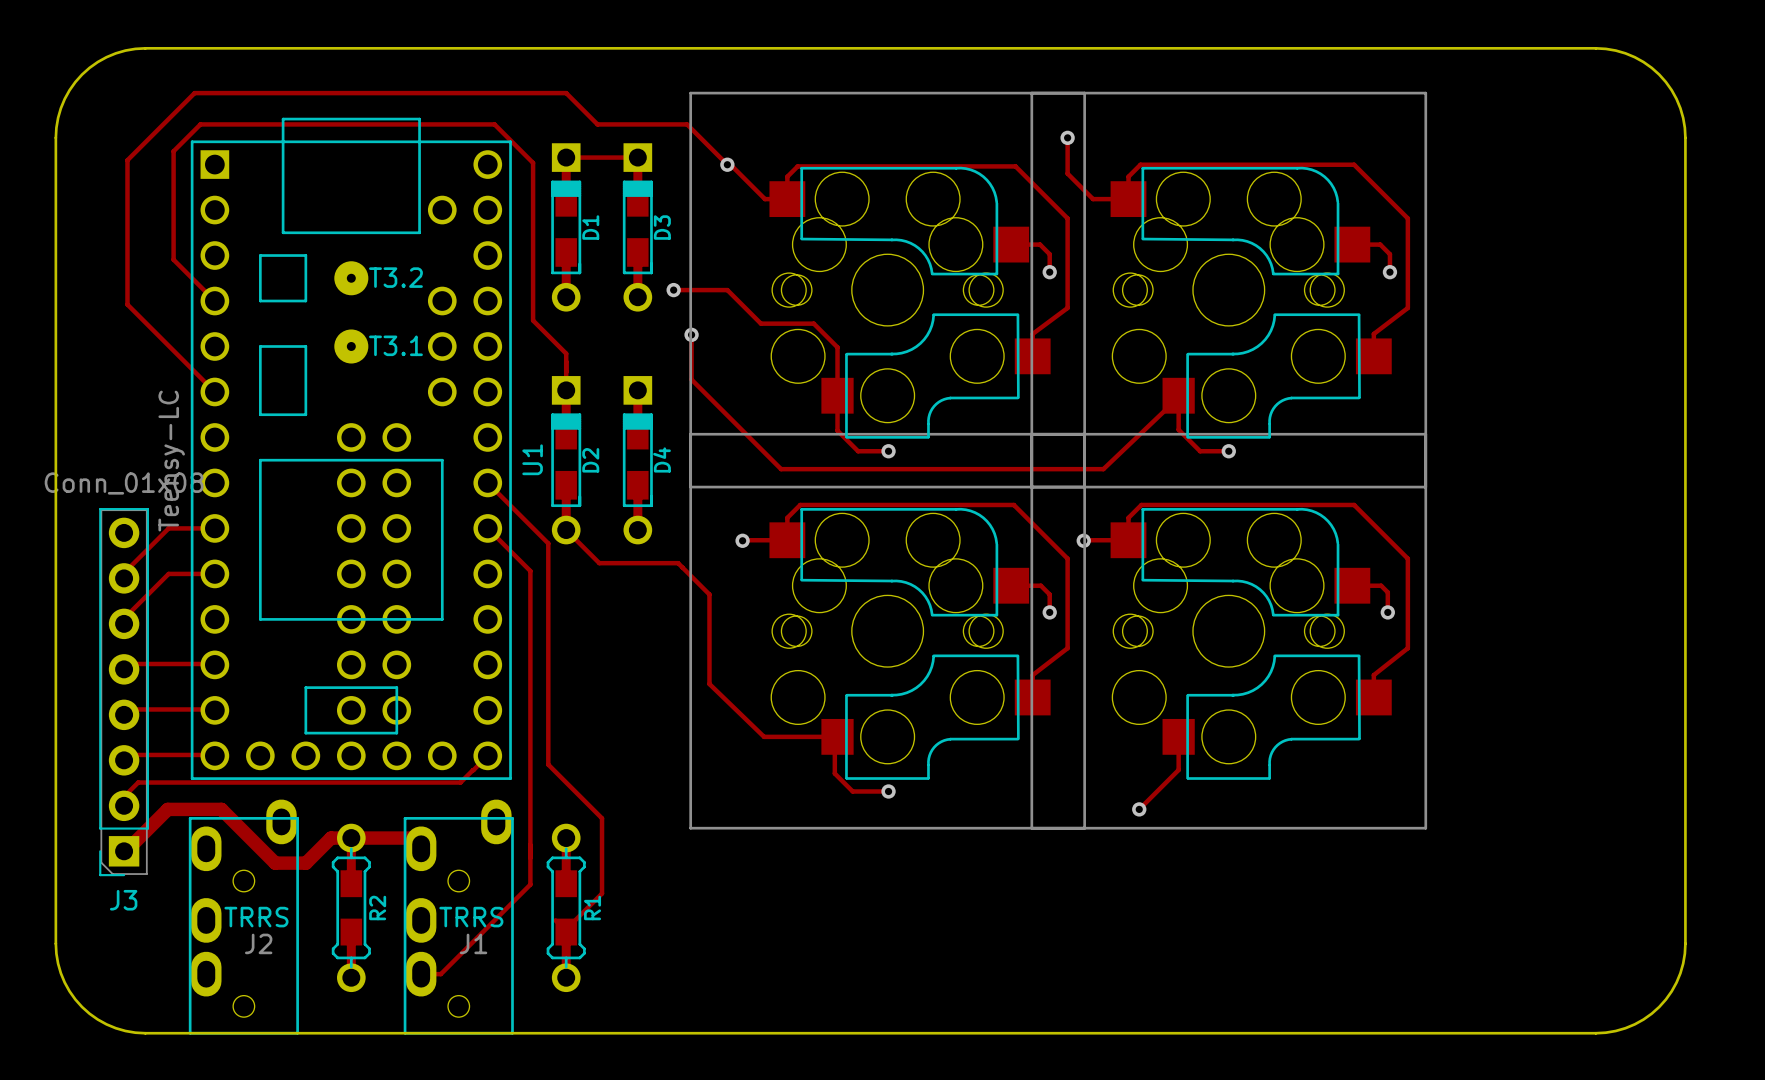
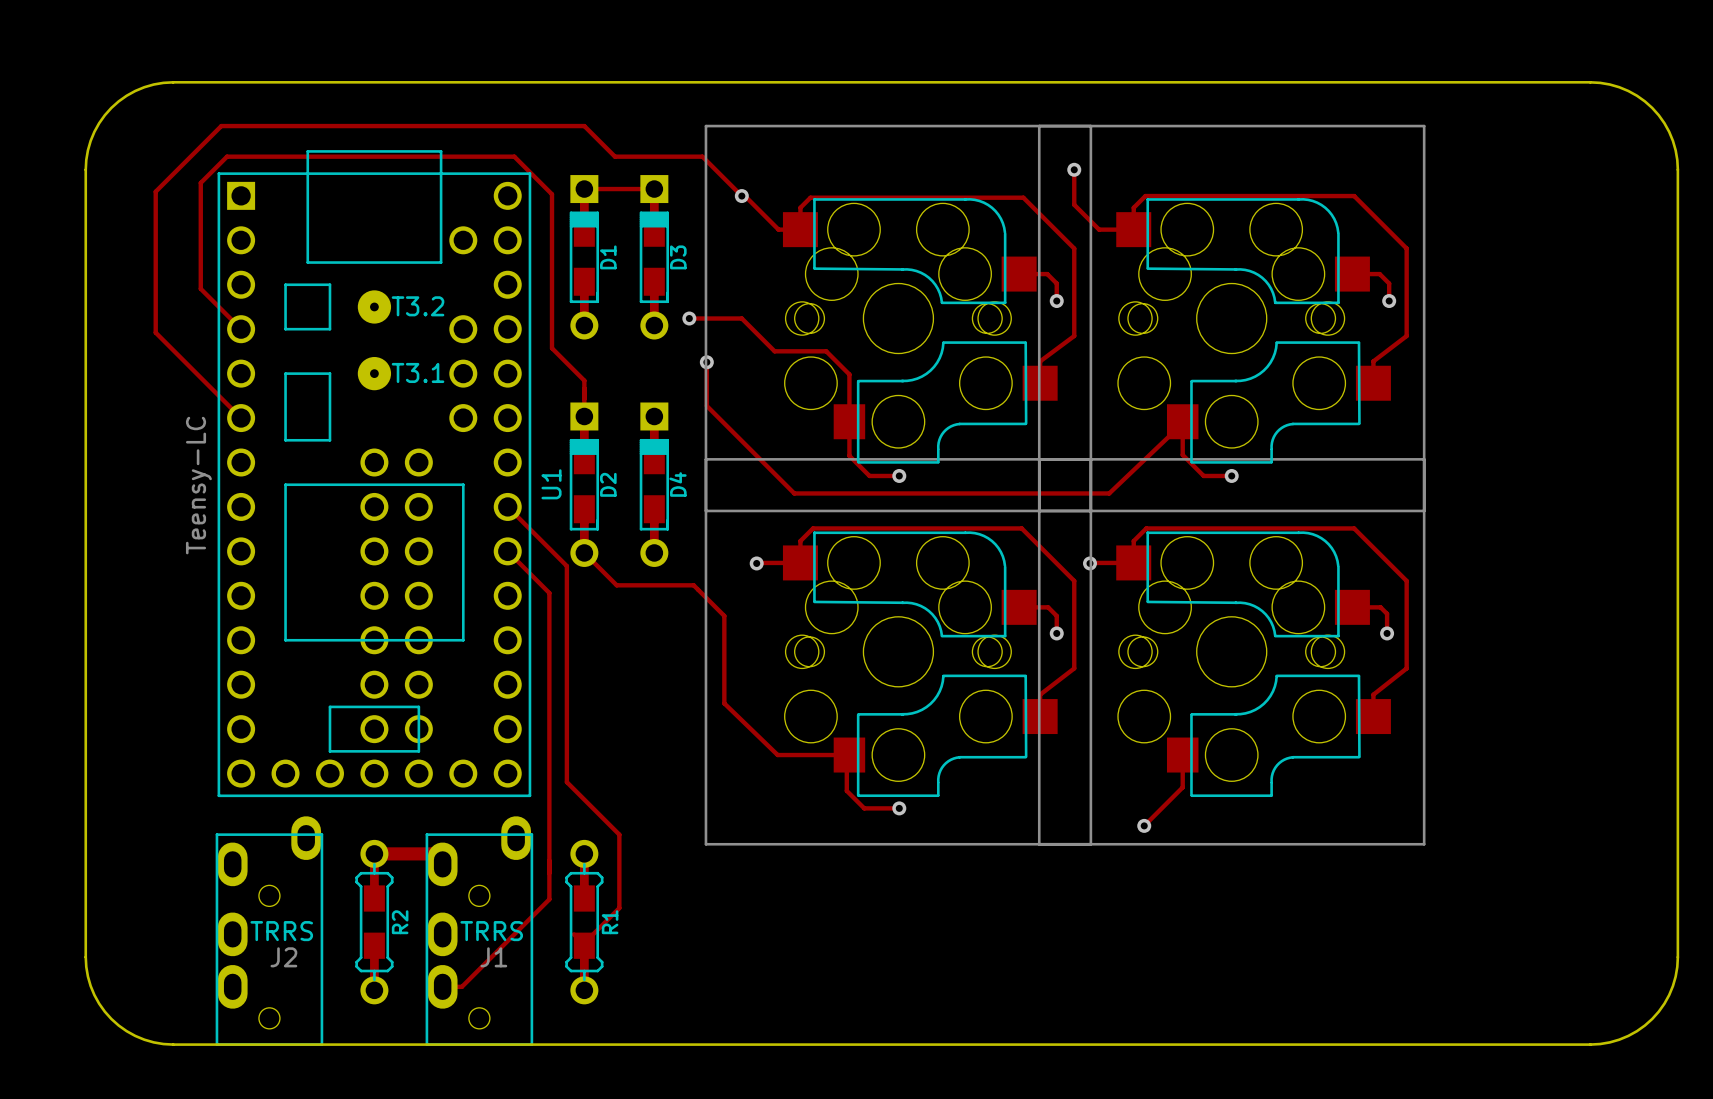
track: (214, 528) (168, 528) (124, 573) -> none
track: (214, 573) (168, 573) (124, 618) -> none
track: (124, 663) (214, 664) -> none
J3: Conn_01x08 (124, 692) -> none
track: (124, 709) (214, 710) -> none
track: (124, 754) (214, 755) -> none
track: (487, 755) (460, 782) (138, 782) (124, 796) (124, 800) -> none
track: (351, 838) (331, 838) (305, 863) (275, 863) (221, 809) (167, 809) (124, 851) -> none

